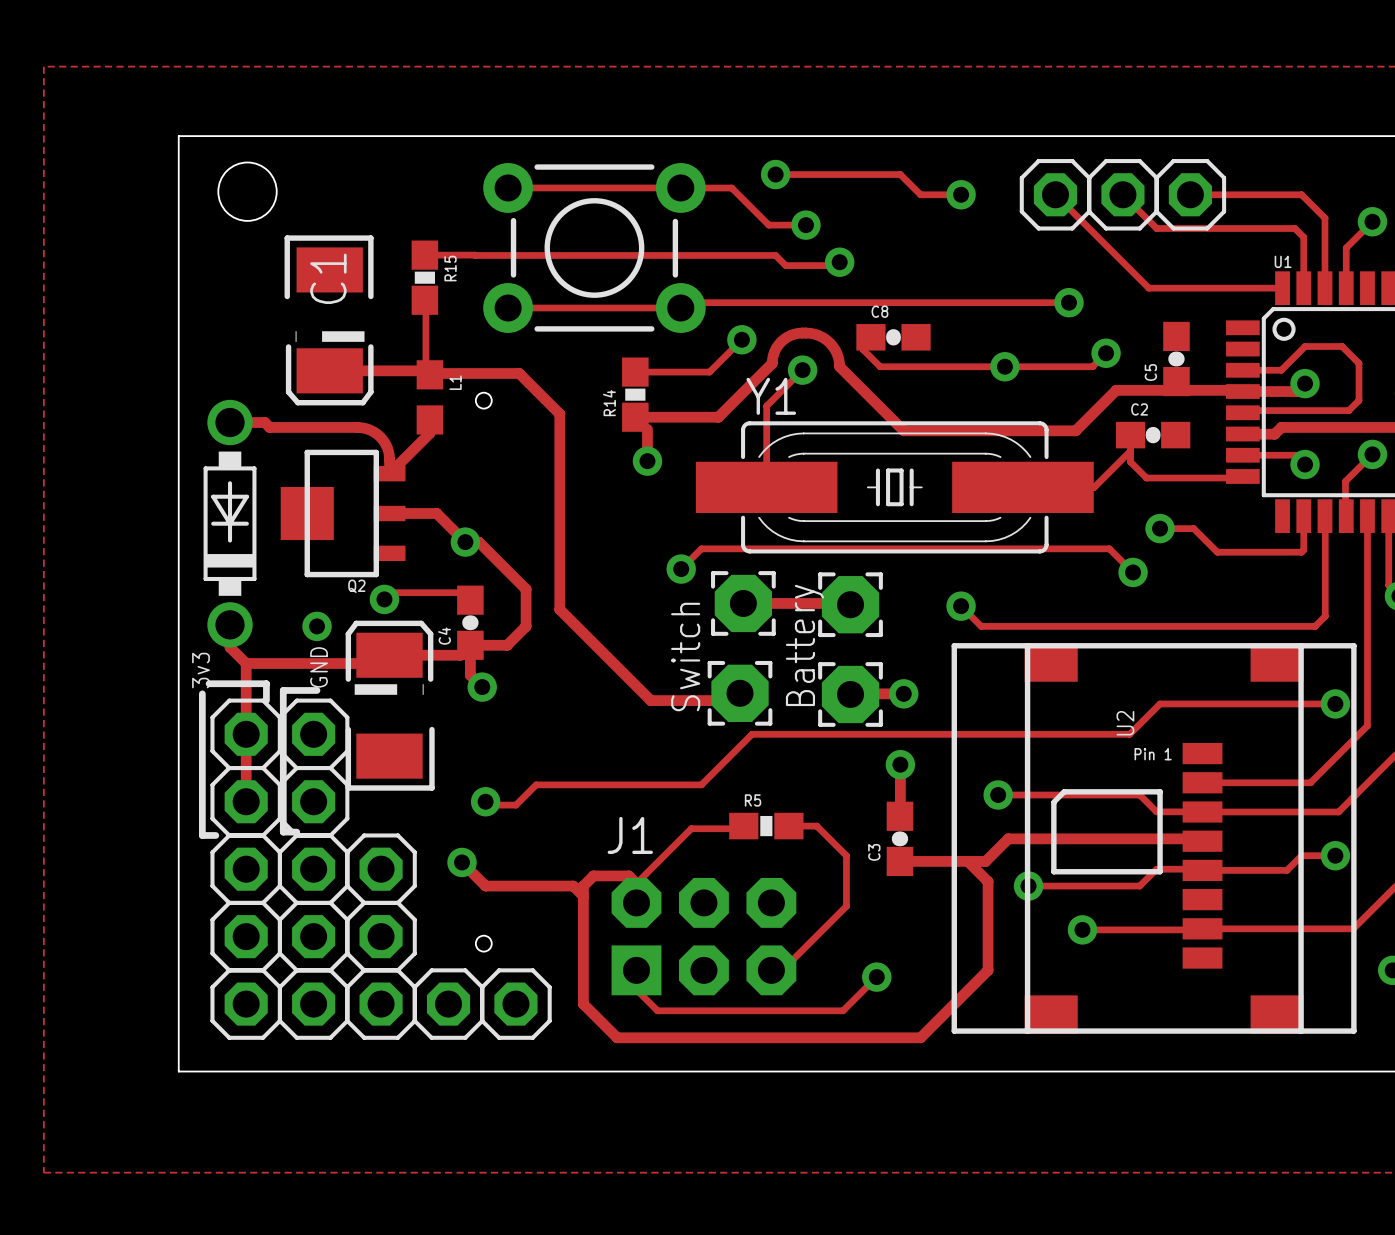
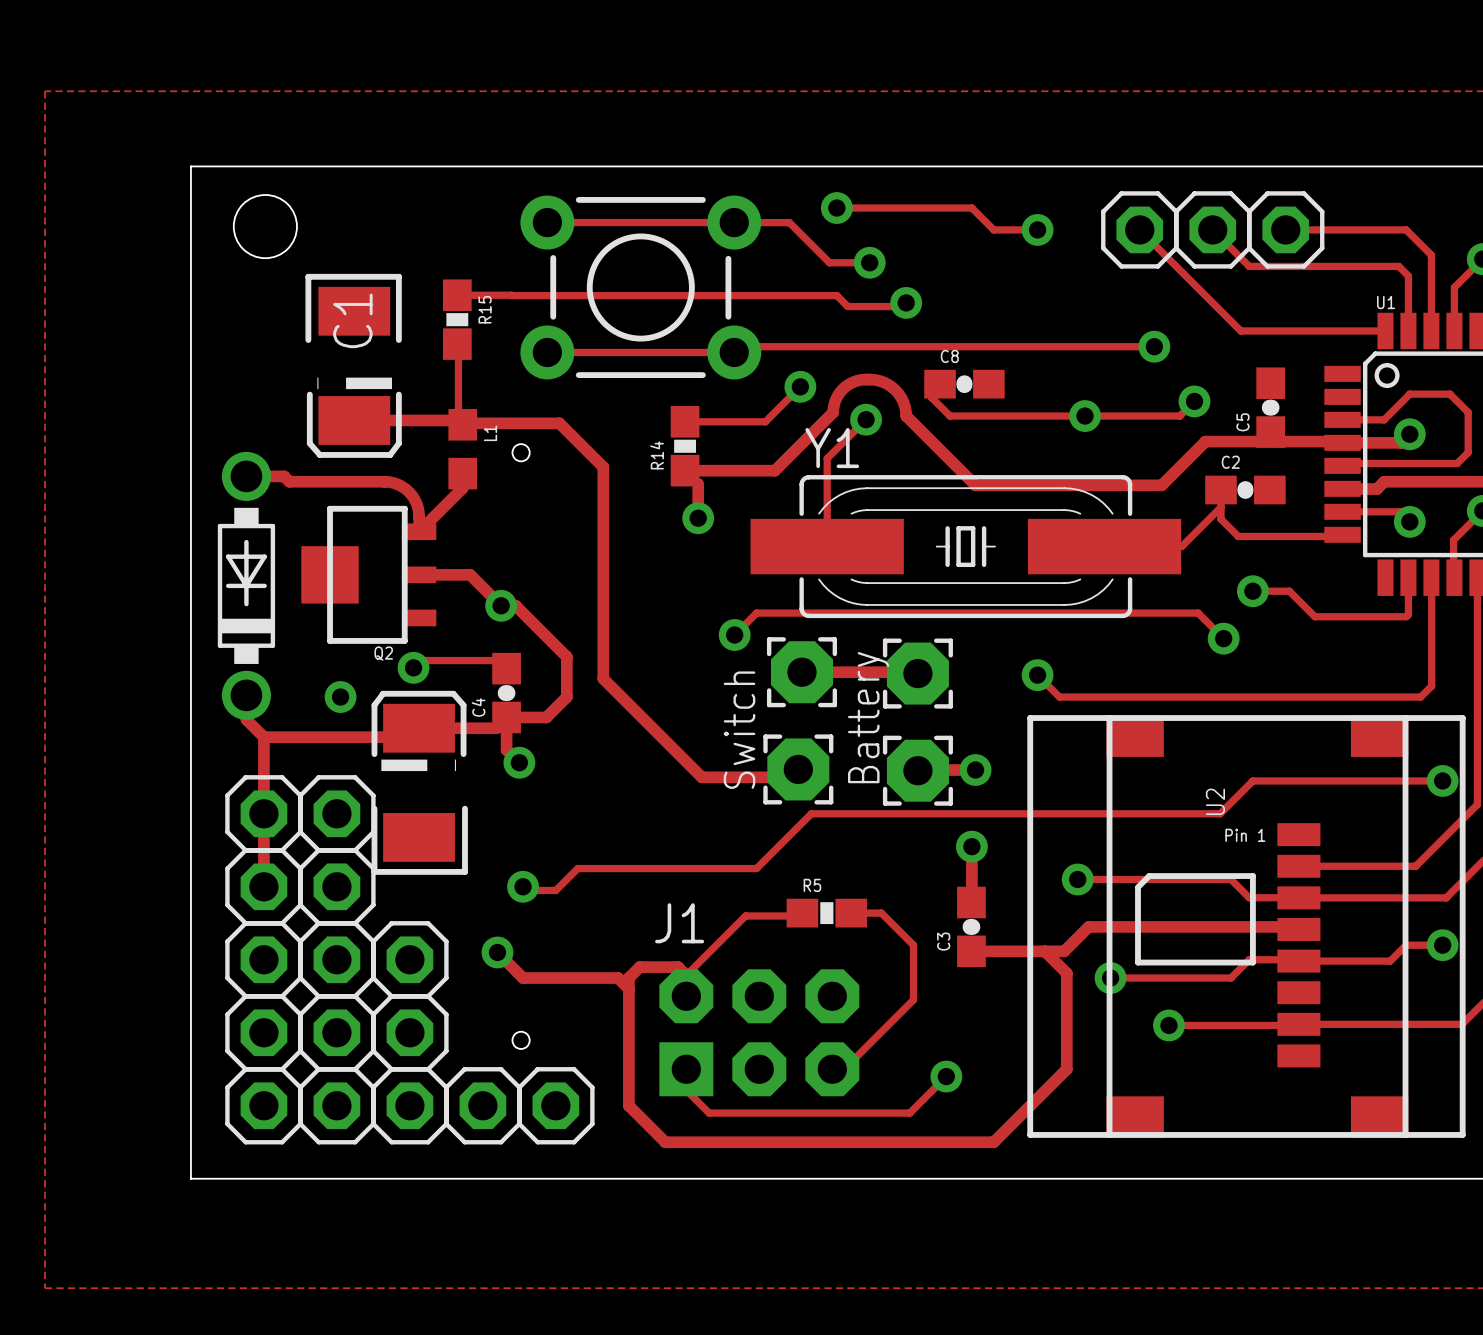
text: GND (319, 667) -> none
text: 3v3 (201, 670) -> none
line: (209, 683) (266, 683) (266, 700) -> none
line: (317, 690) (283, 690) (283, 832) (296, 832) -> none
line: (202, 693) (202, 835) (215, 835) -> none

